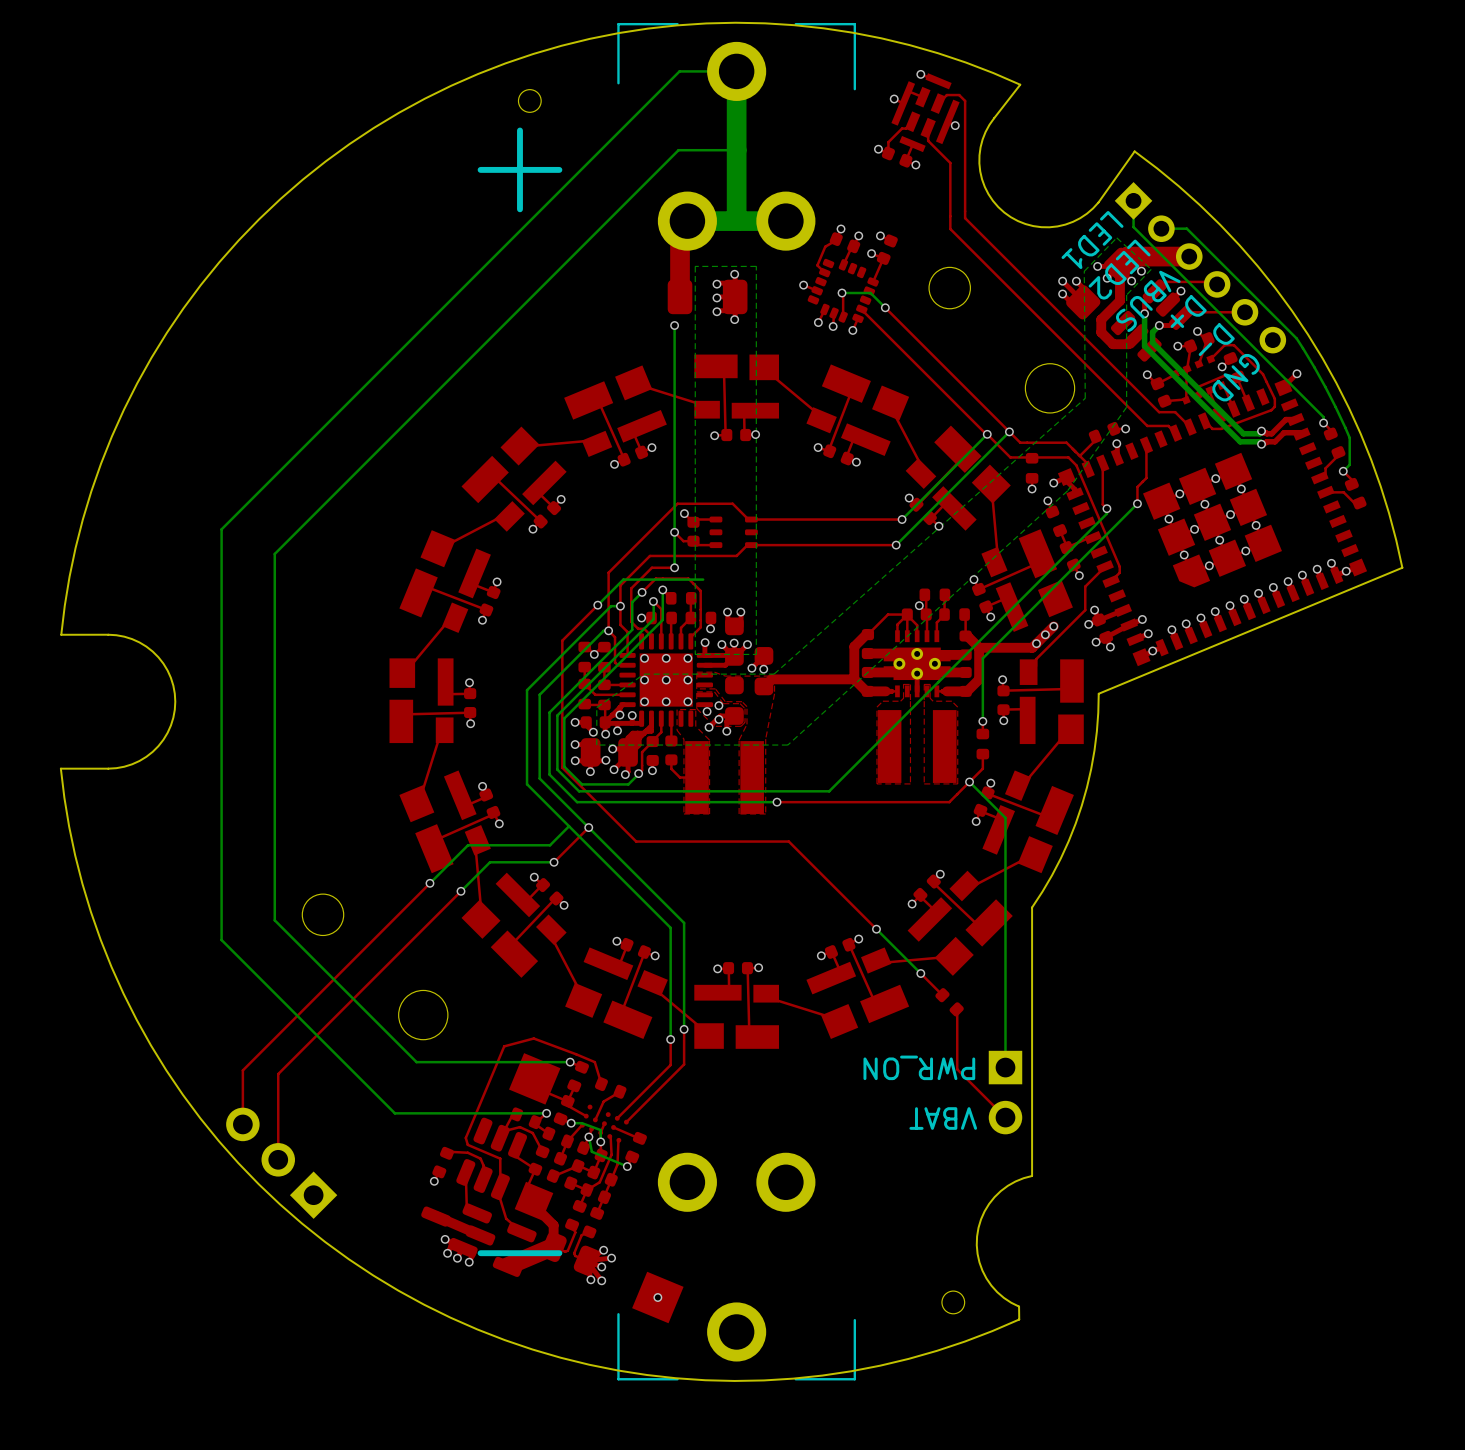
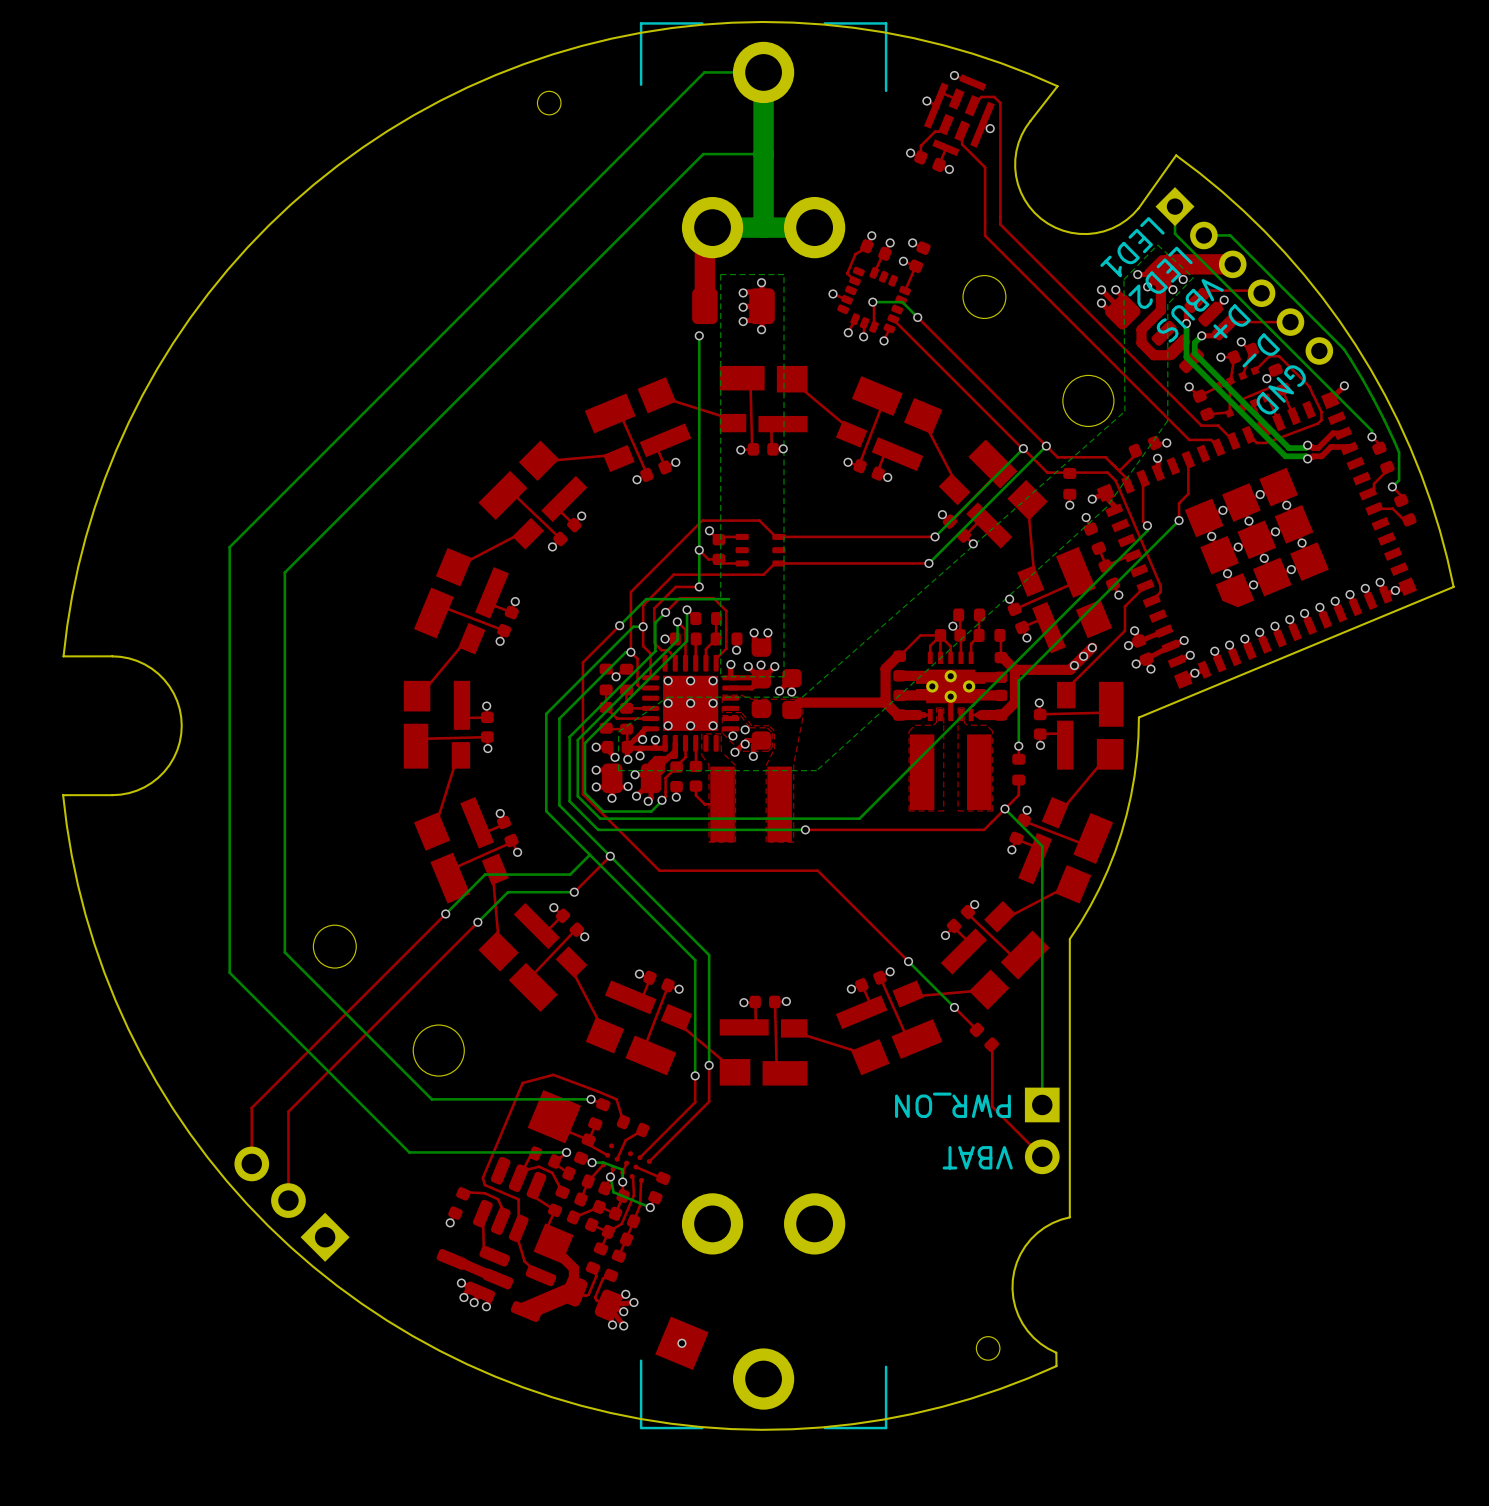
line: (519, 130) (519, 209) -> none
line: (559, 169) (480, 169) -> none
line: (559, 1253) (480, 1253) -> none

